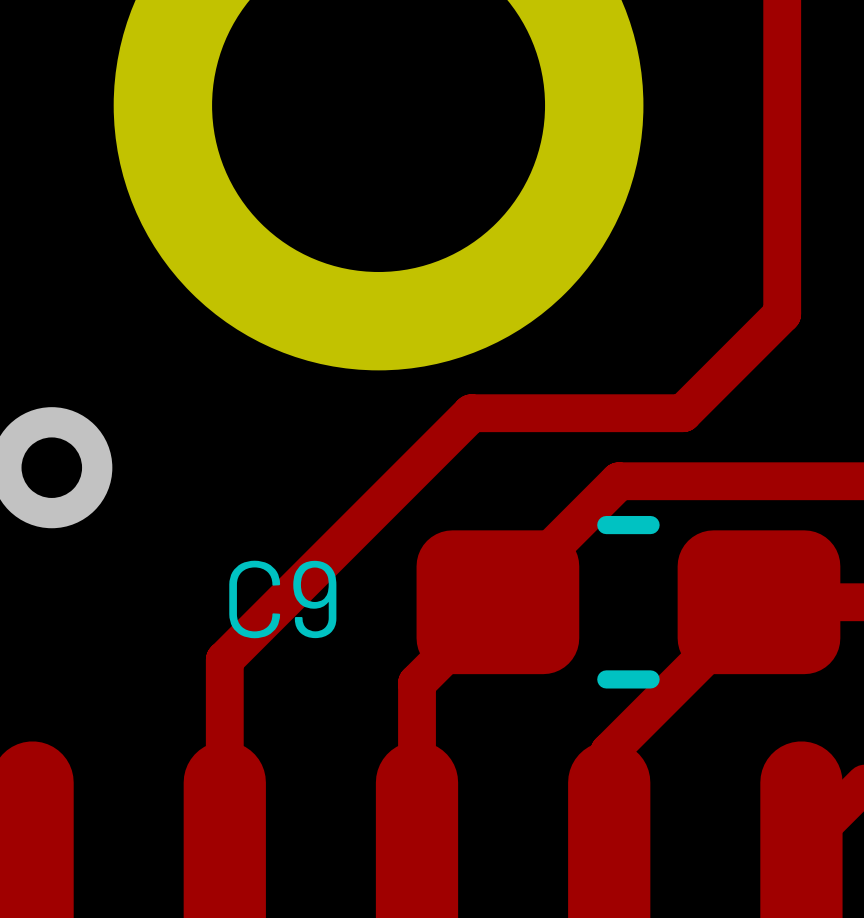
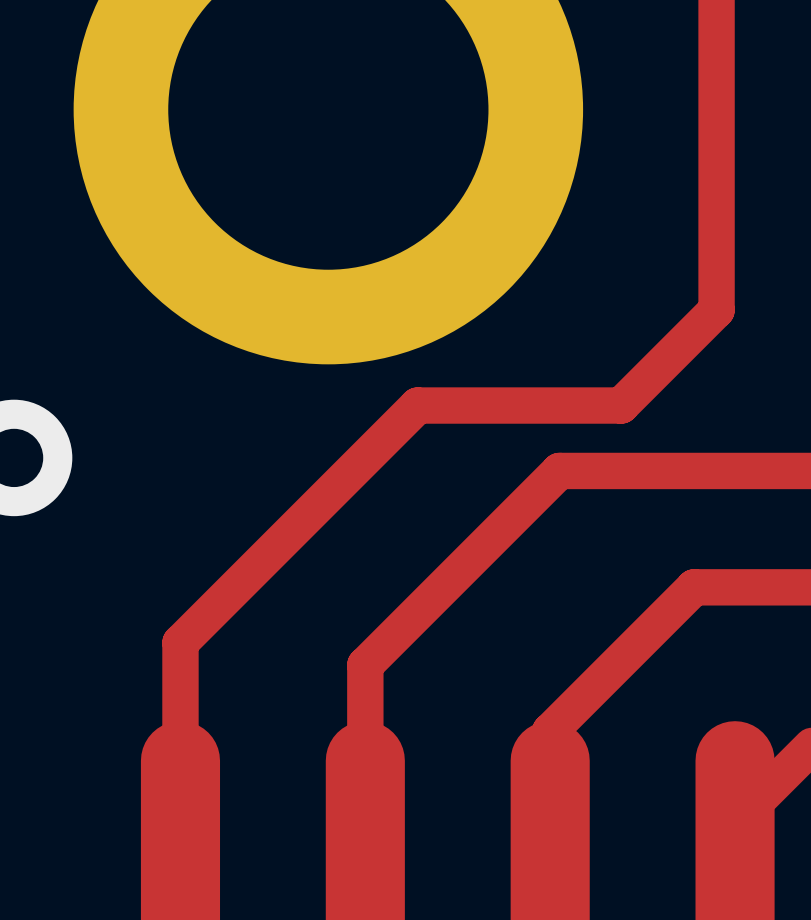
C9: (628, 602) -> none

